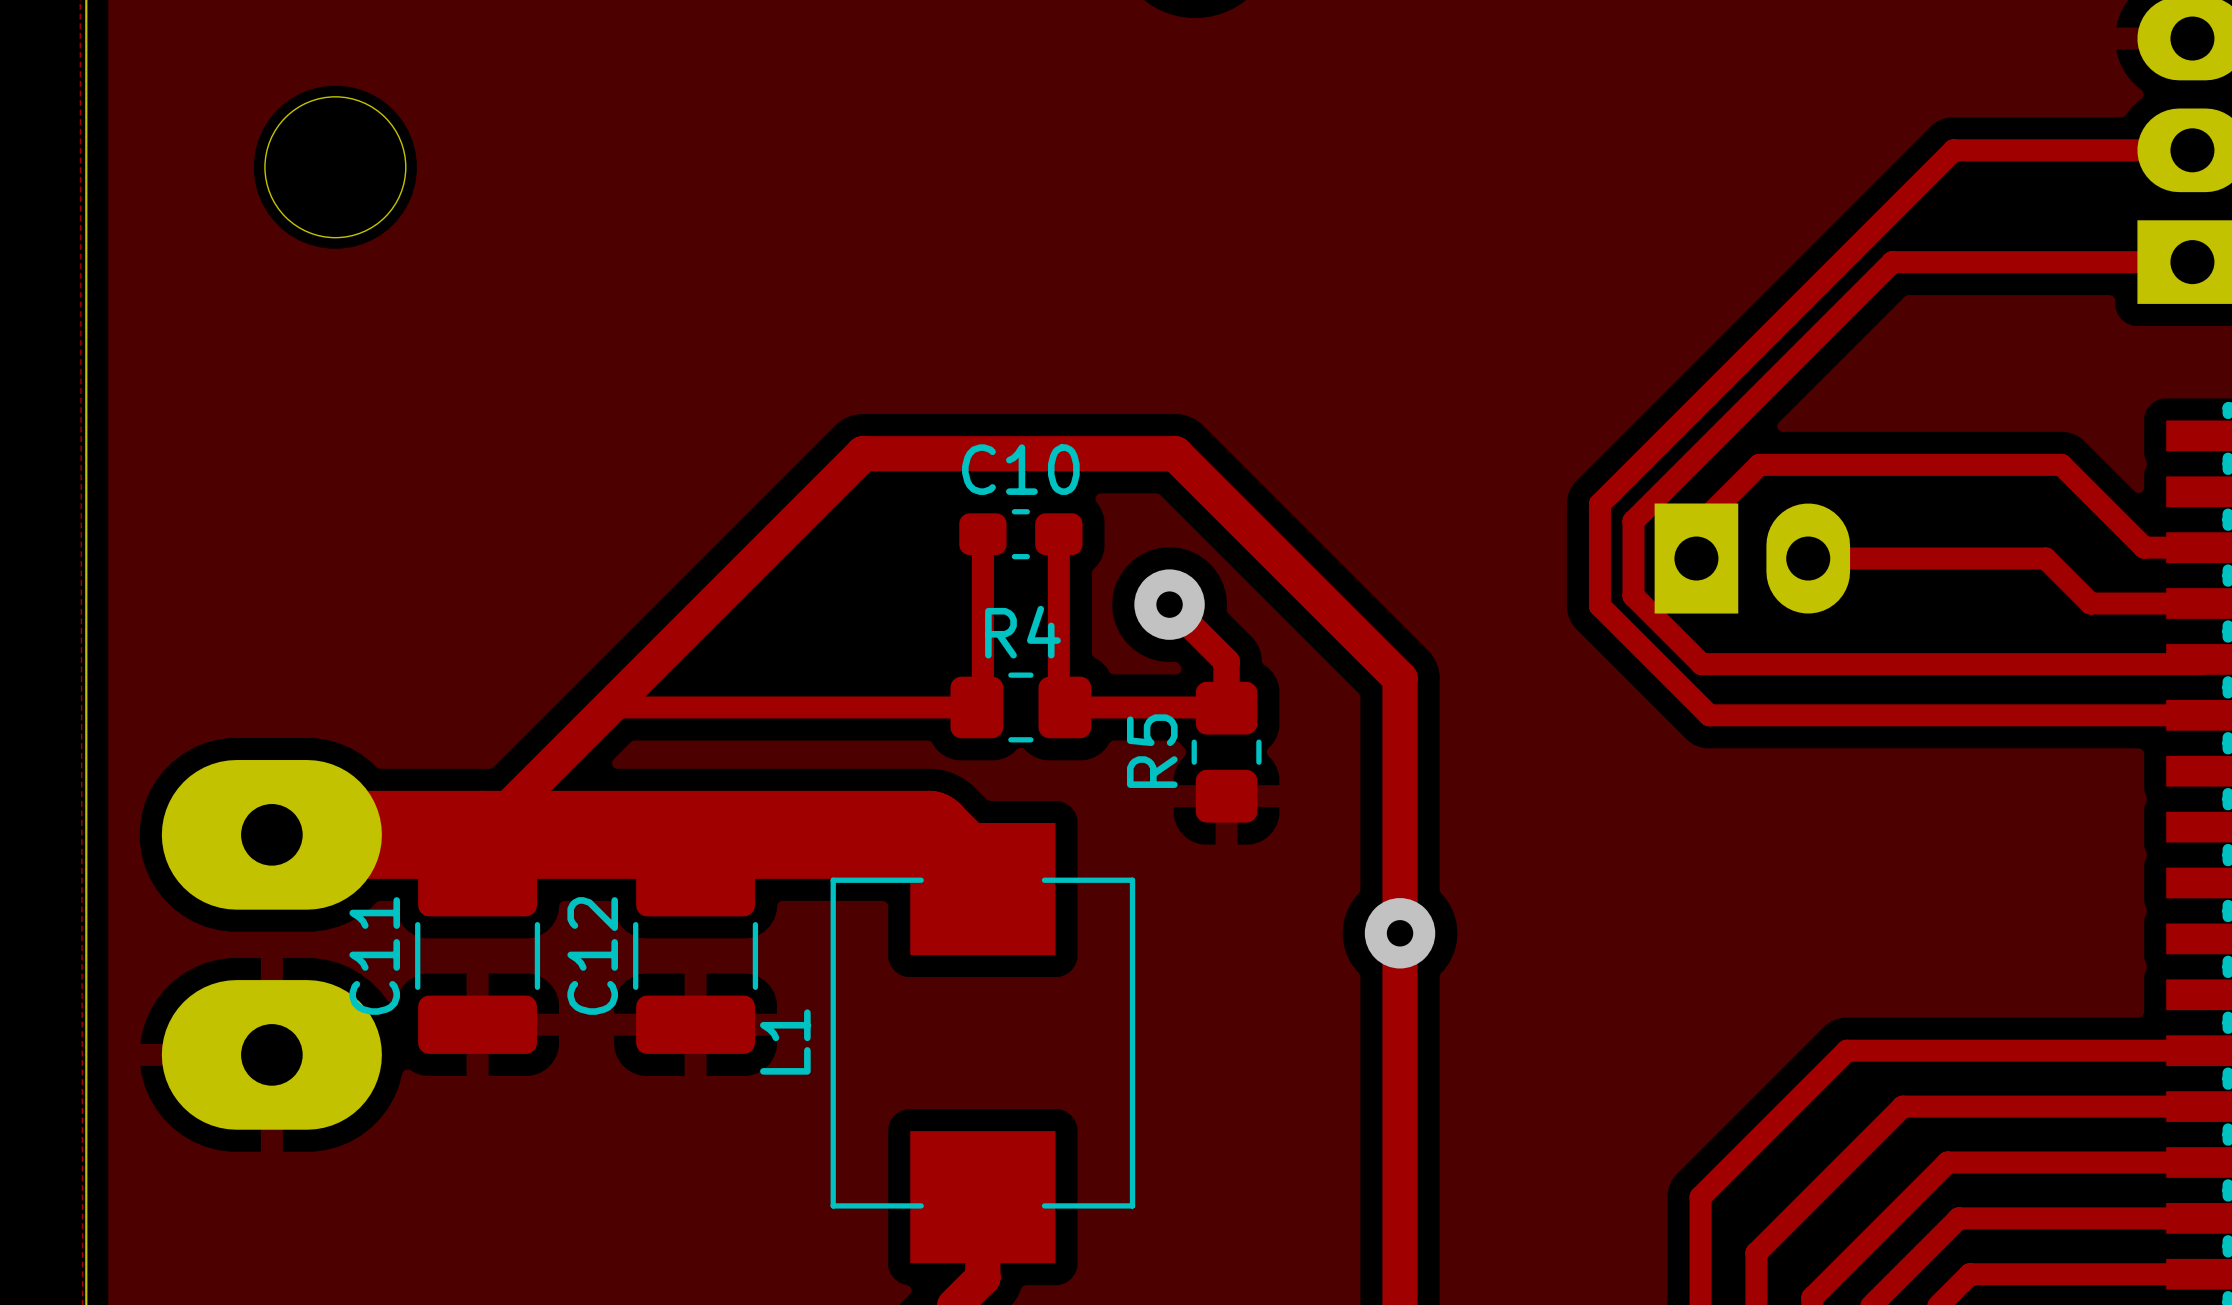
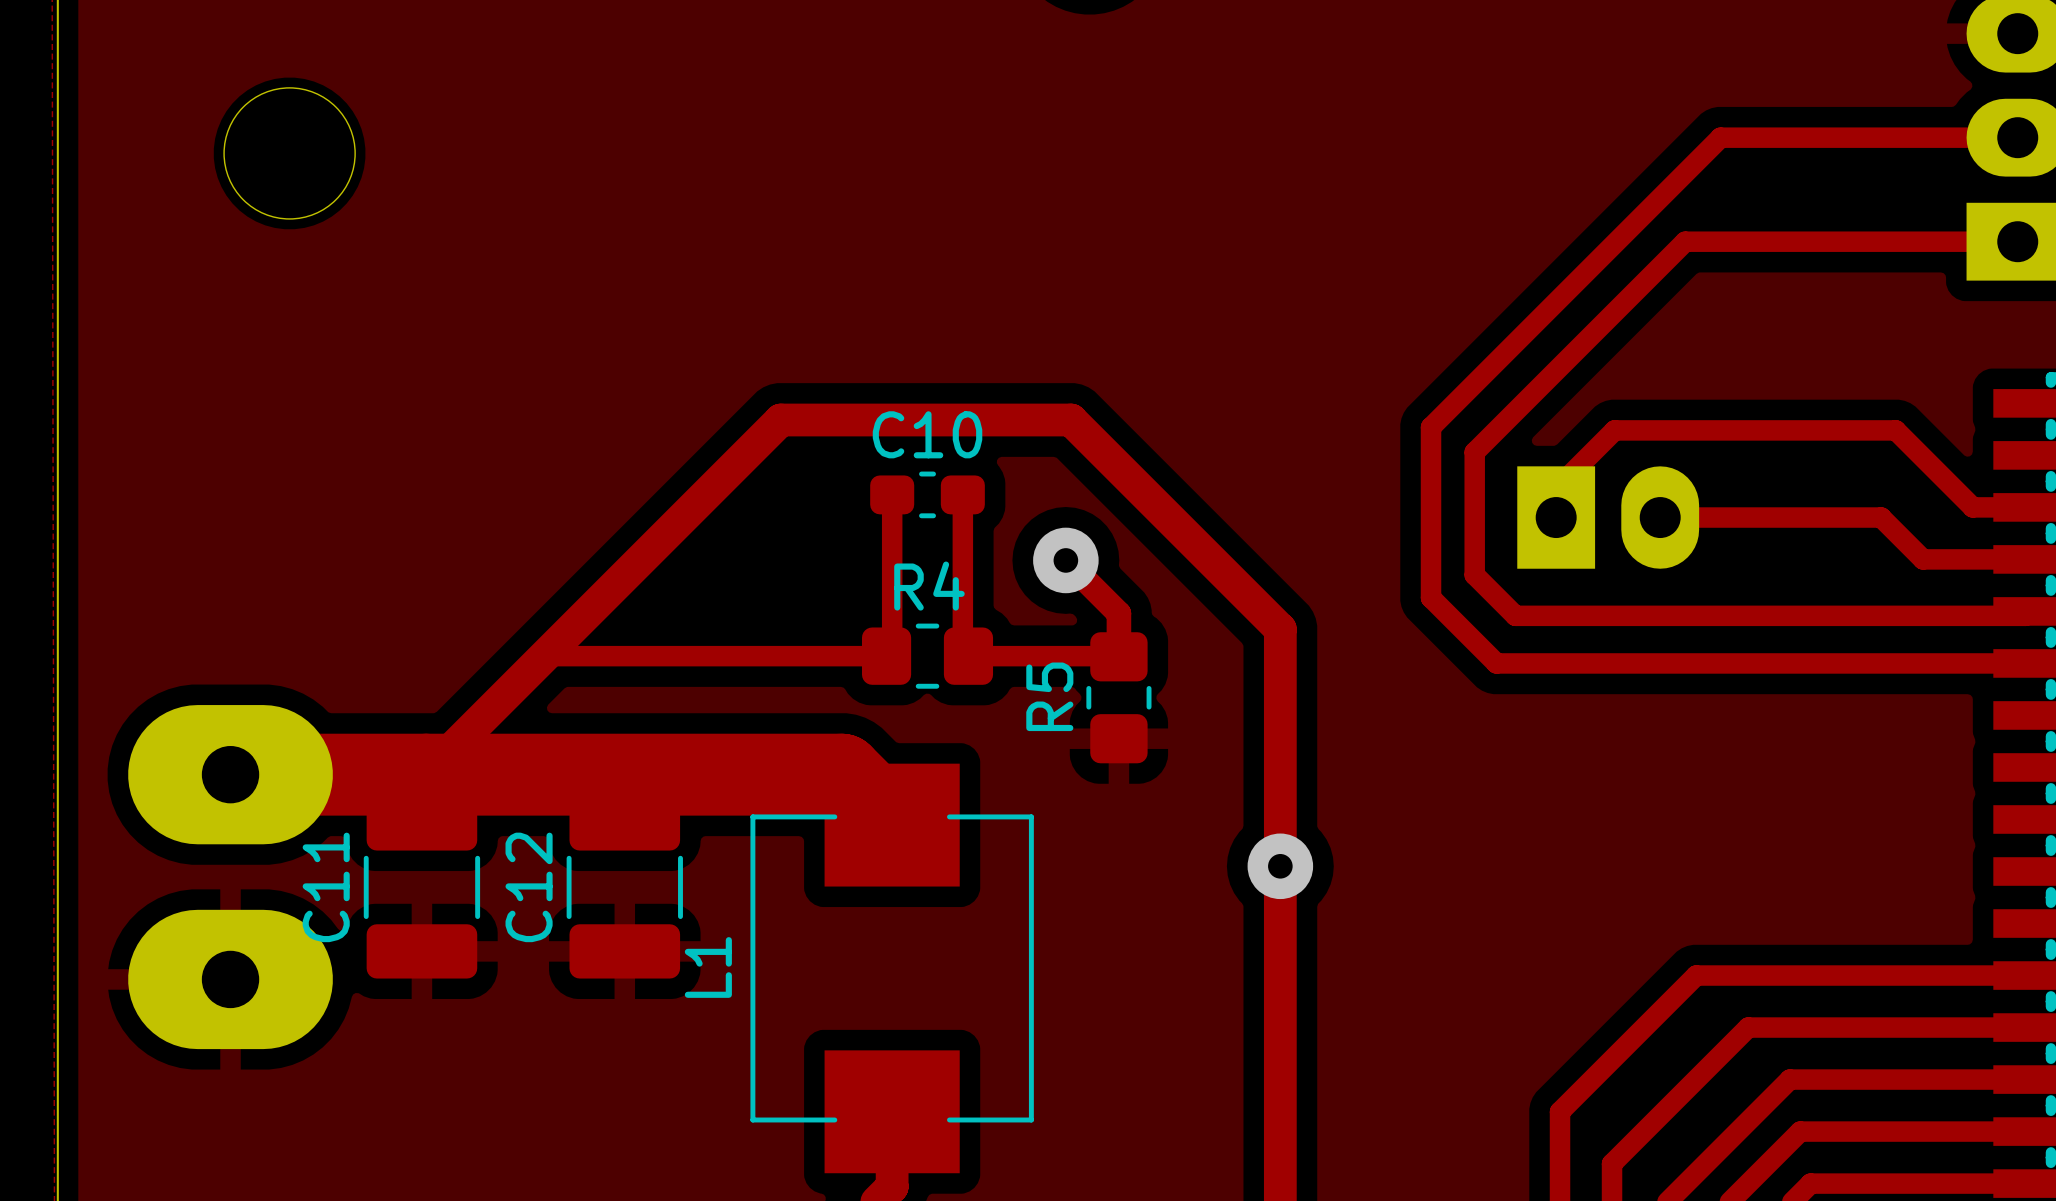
track: (1953, 150) (1599, 504) (1599, 605) (1709, 715) -> (1795, 137) (1720, 137) (1431, 427) (1431, 597) (1496, 663) (1568, 663)
track: (1892, 262) (1633, 521) (1633, 595) (1701, 664) -> (1738, 241) (1685, 241) (1474, 452) (1474, 575) (1515, 615) (1561, 615)

